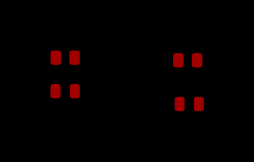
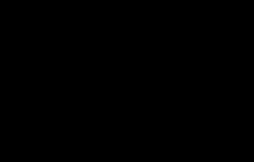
part: (65, 57) -> none
part: (187, 60) -> none
part: (65, 91) -> none
part: (189, 104) -> none

